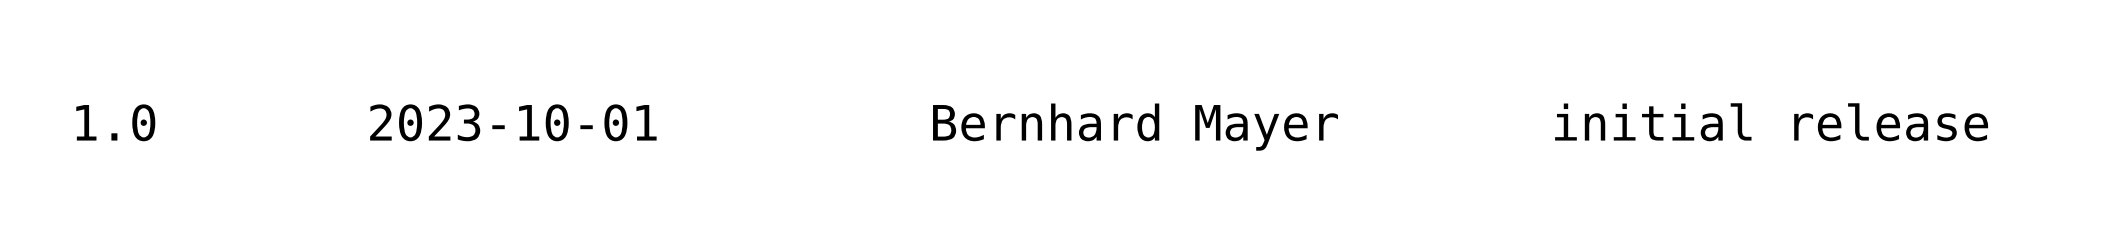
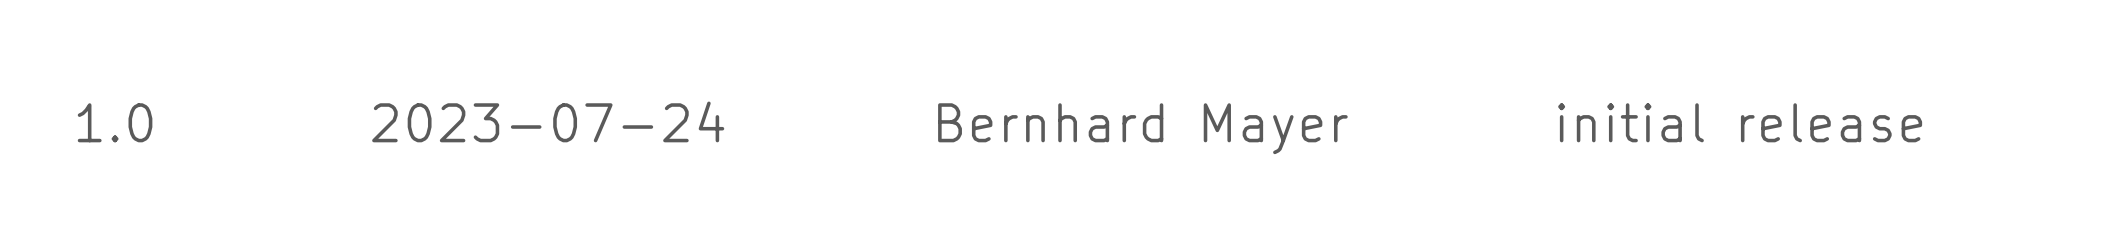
text: 2023-10-01 (513, 122) -> 2023-07-24 (548, 121)

